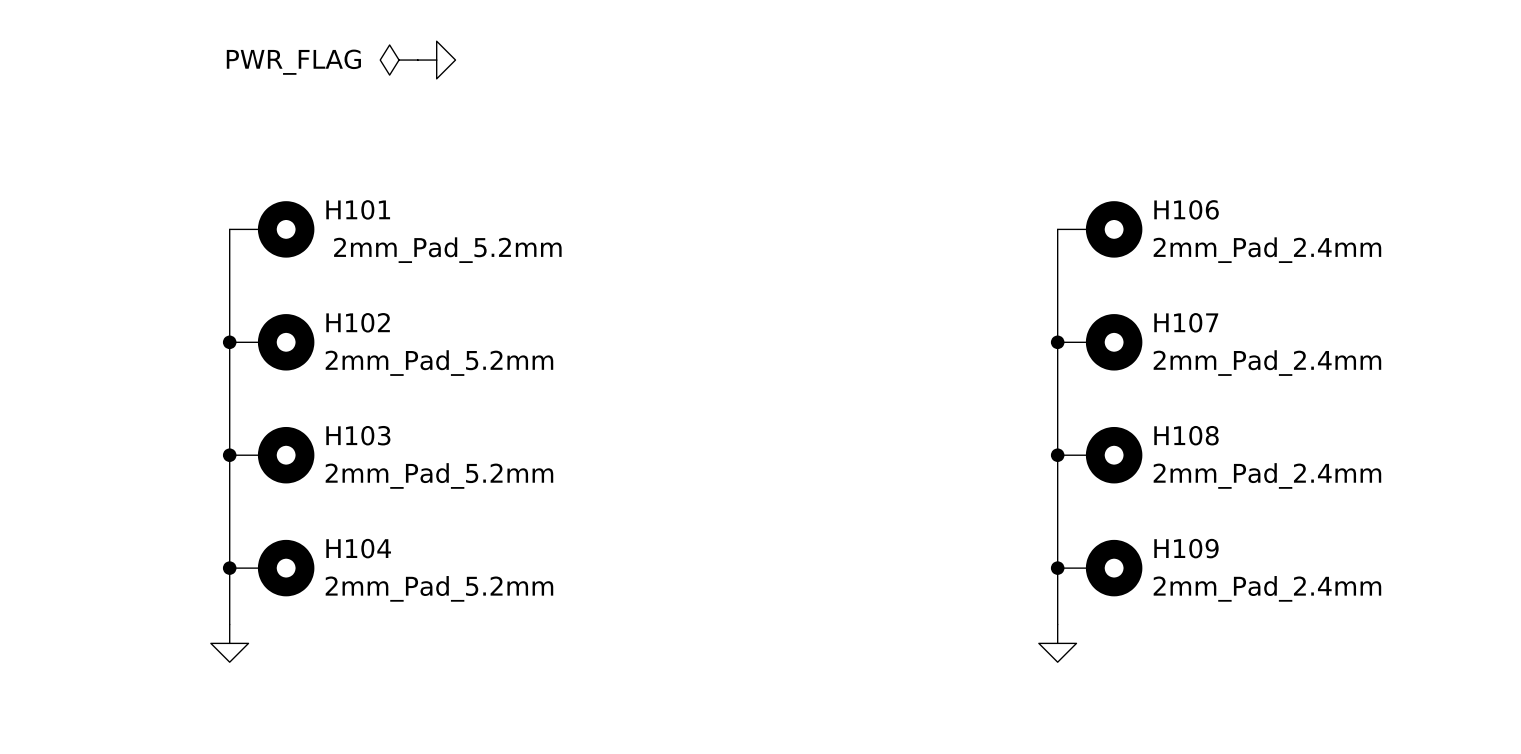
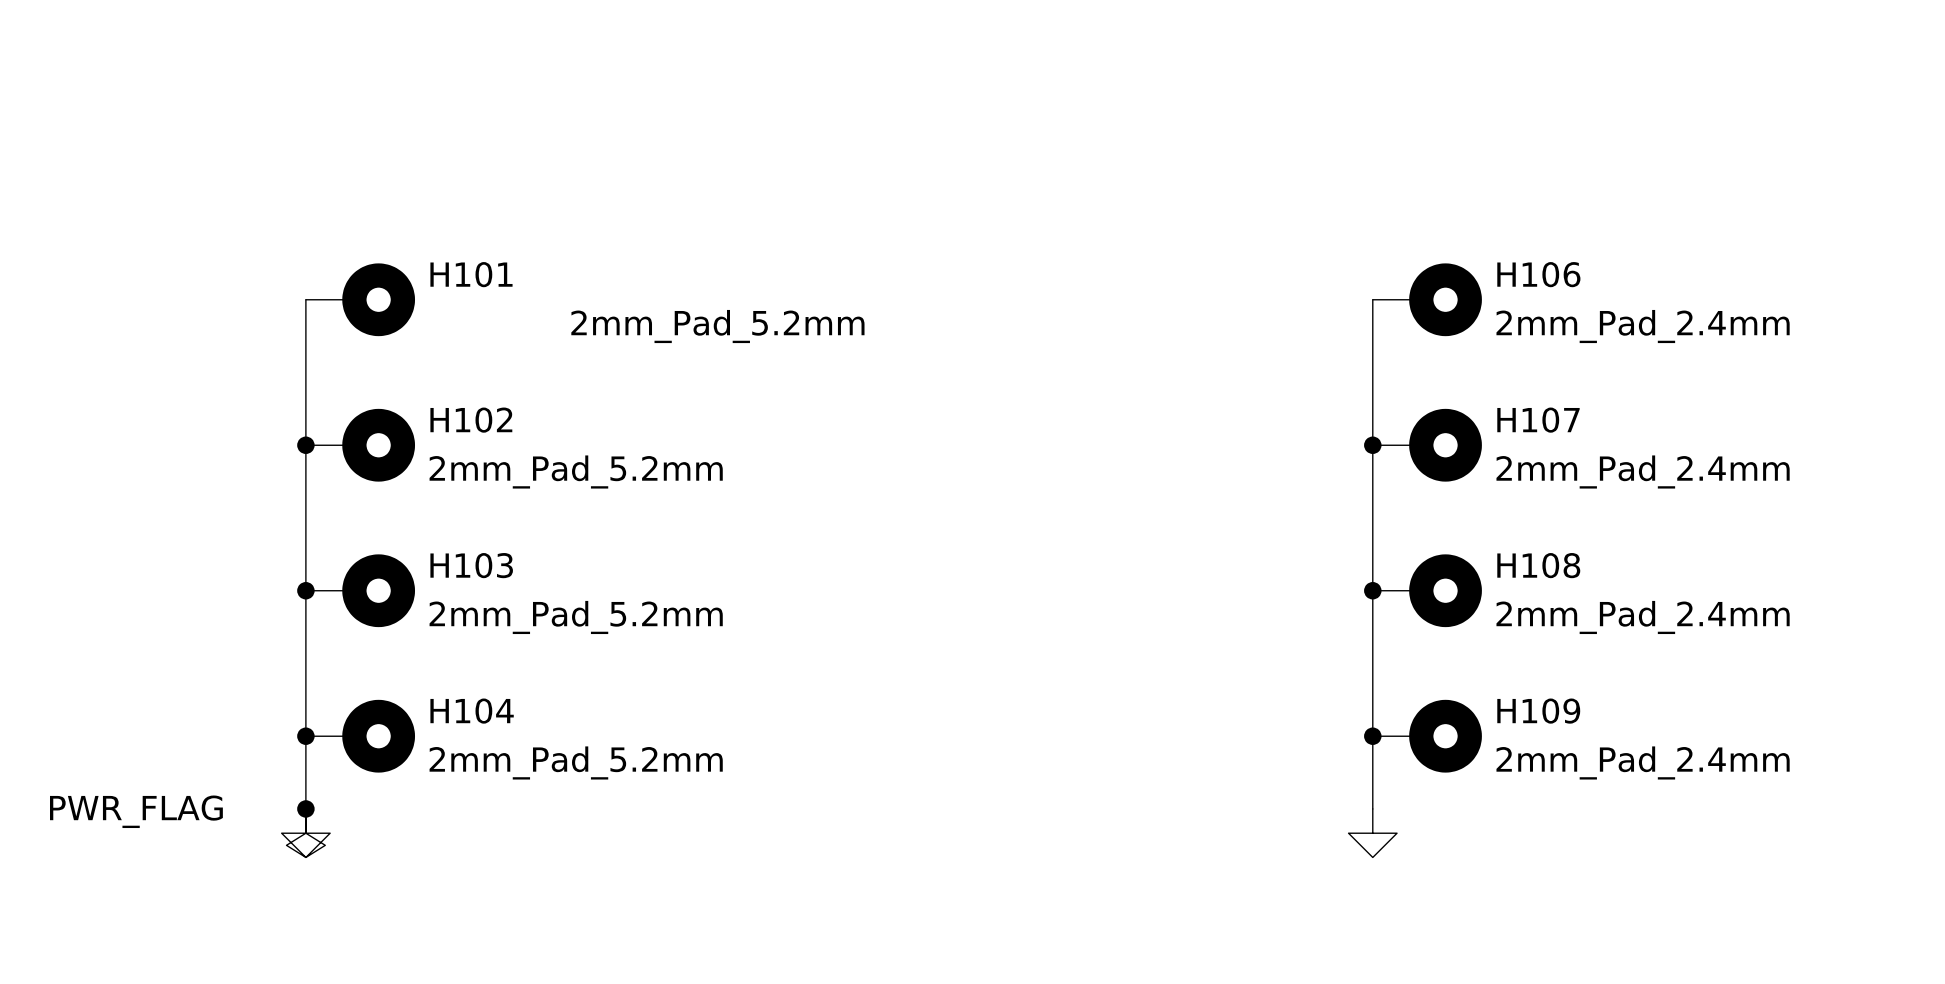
power symbol: PWR_FLAG (399, 60) -> none
power symbol: (436, 60) -> none
H101 value position: 2mm_Pad_5.2mm (447, 250) -> 2mm_Pad_5.2mm (717, 326)
junction: none -> (305, 808)
power symbol: none -> PWR_FLAG (305, 833)

